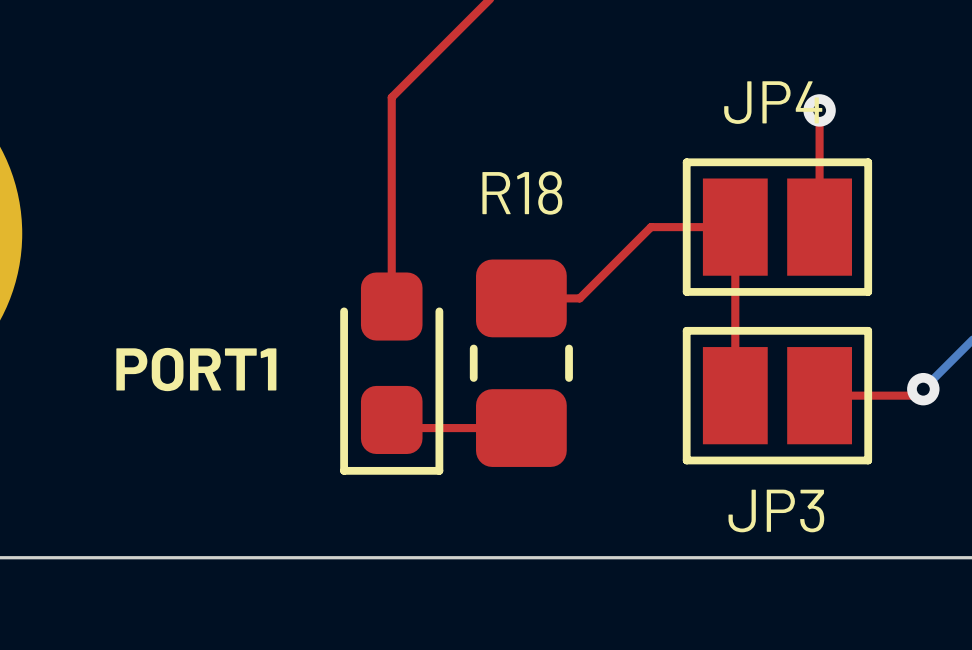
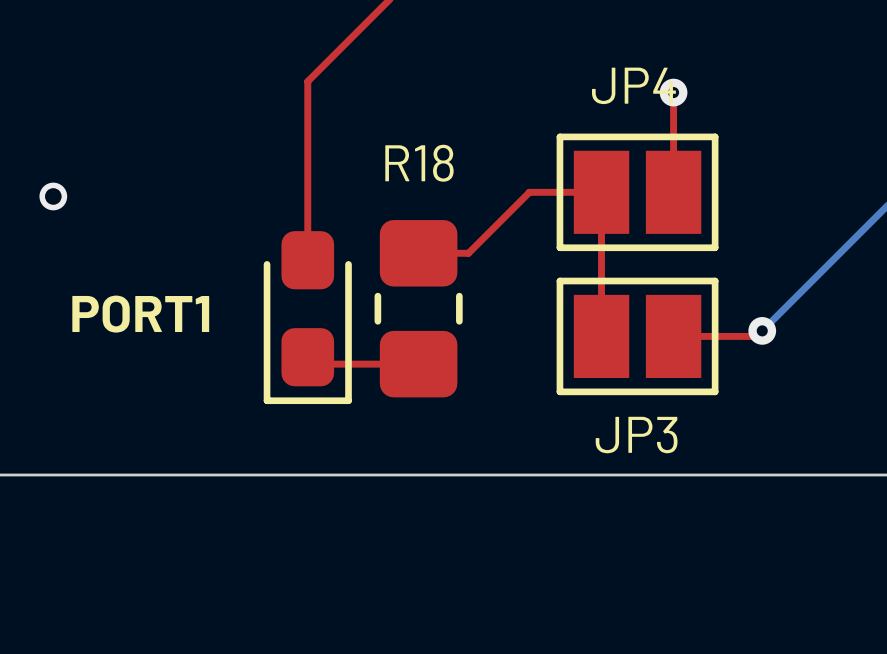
via: none -> (53, 196)

